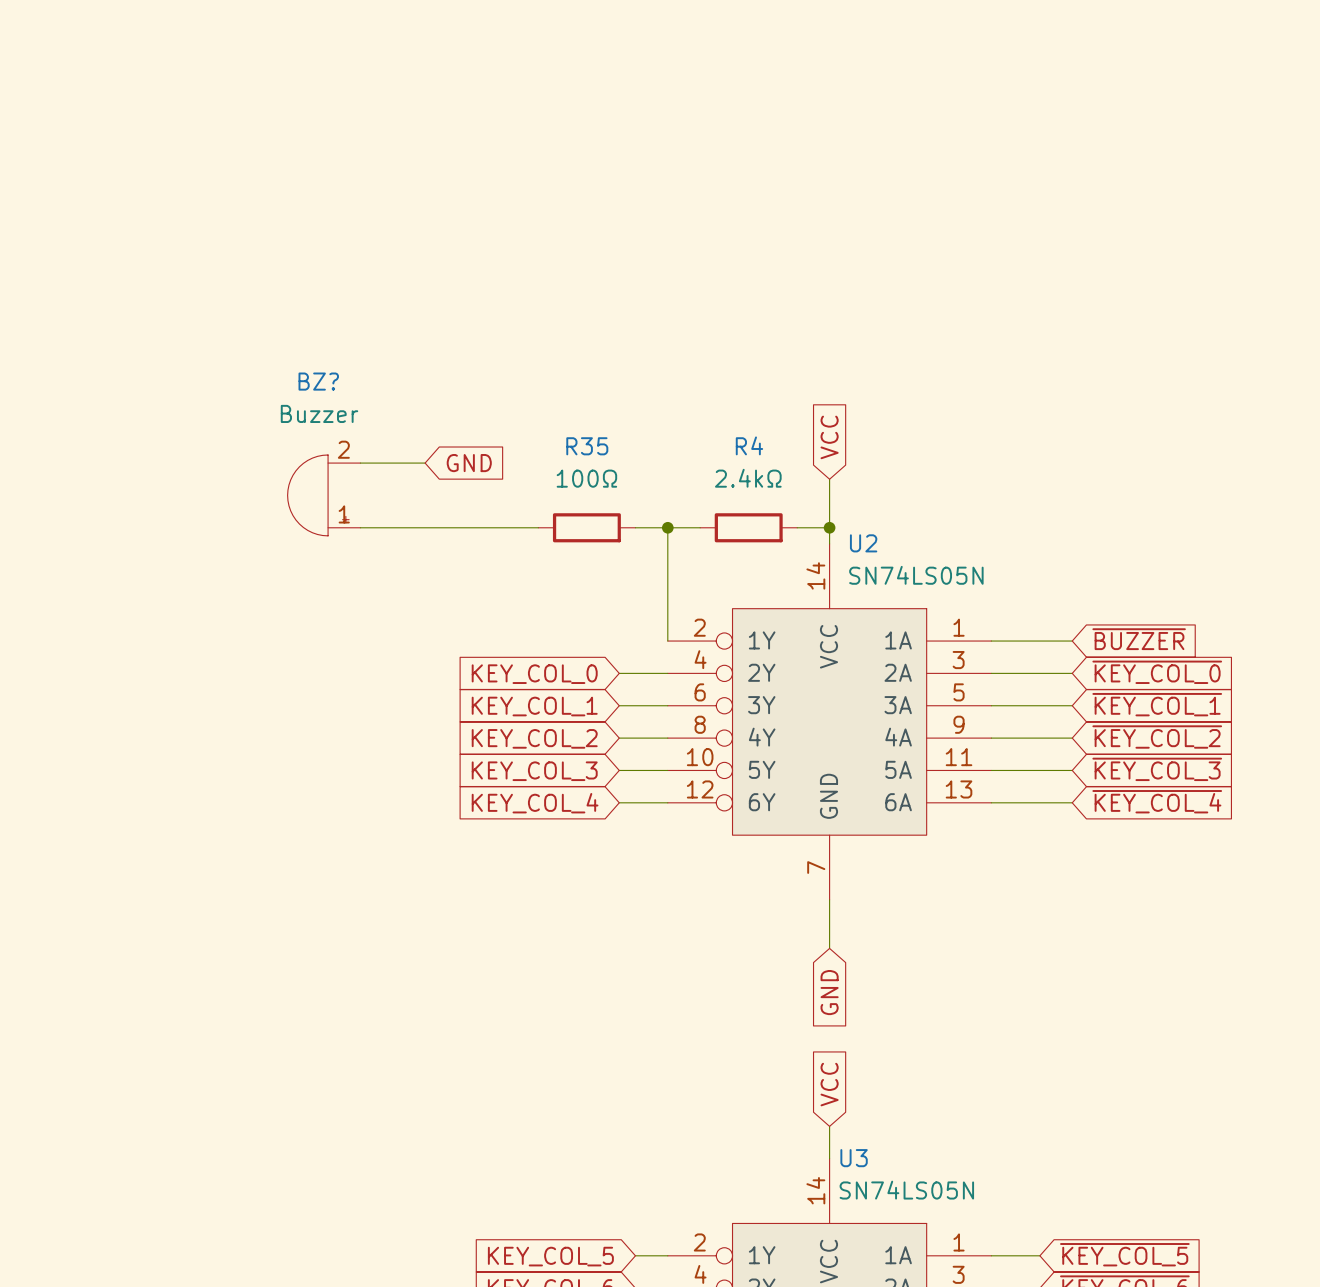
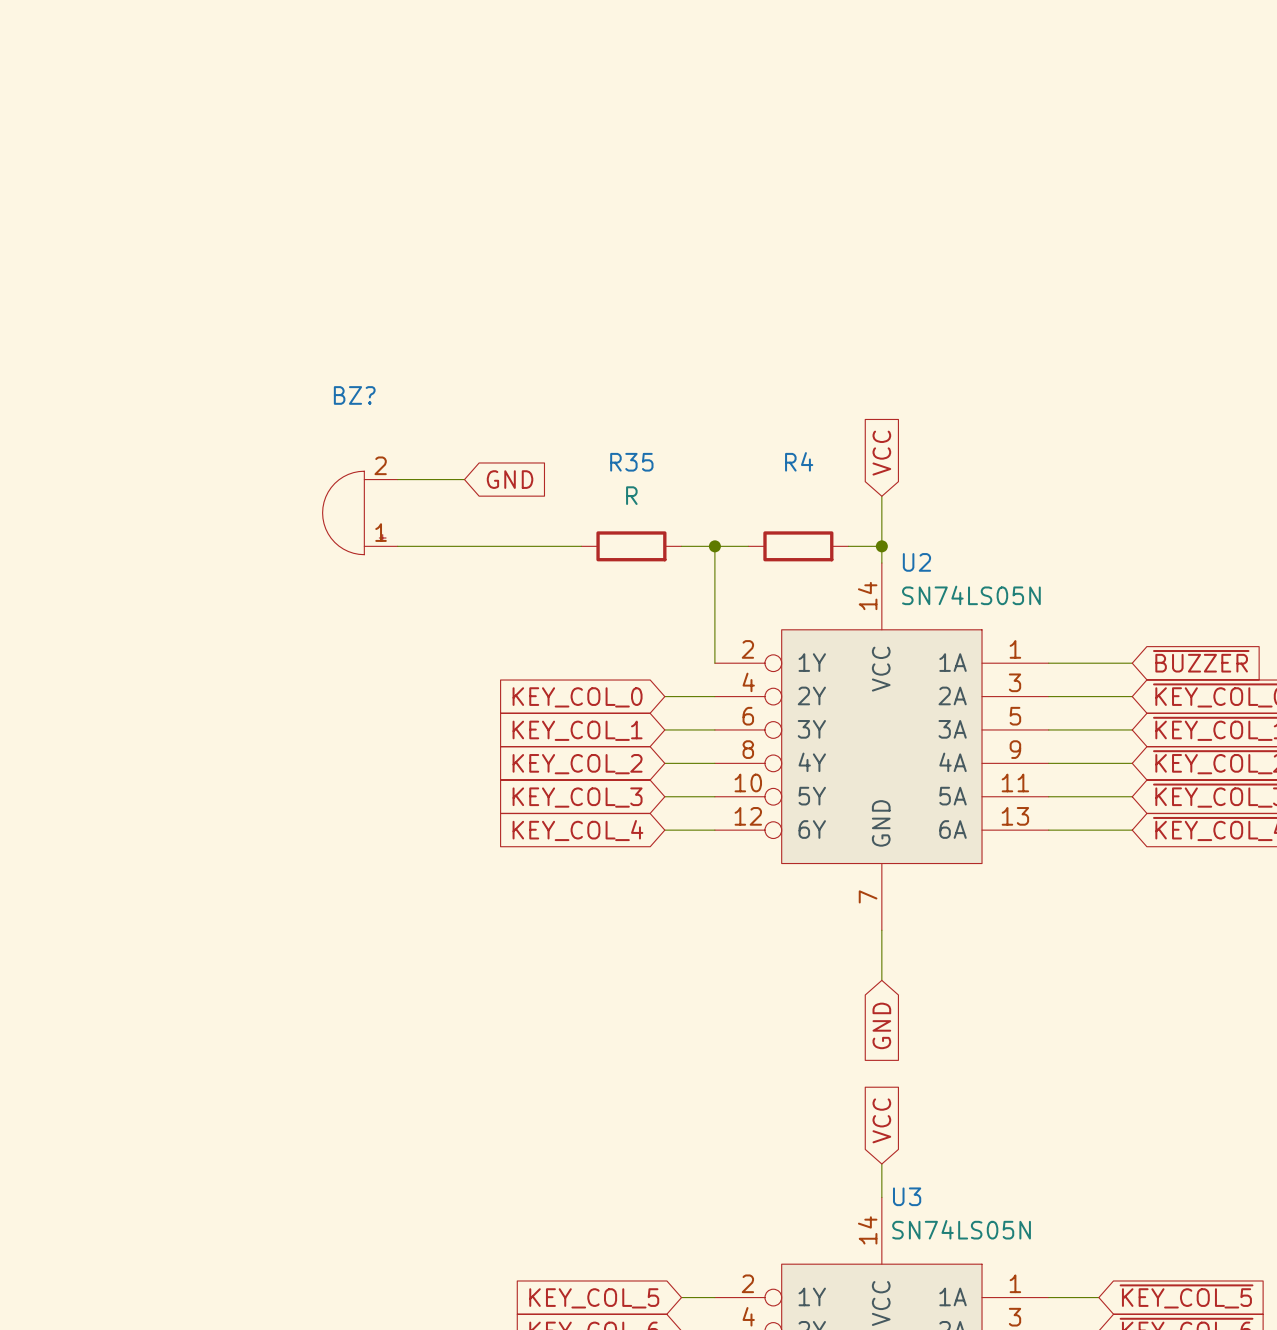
BZ? value: Buzzer (319, 413) -> none
R35 value: 100Ω (586, 478) -> R (631, 495)
R4 value: 2.4kΩ (748, 478) -> none

